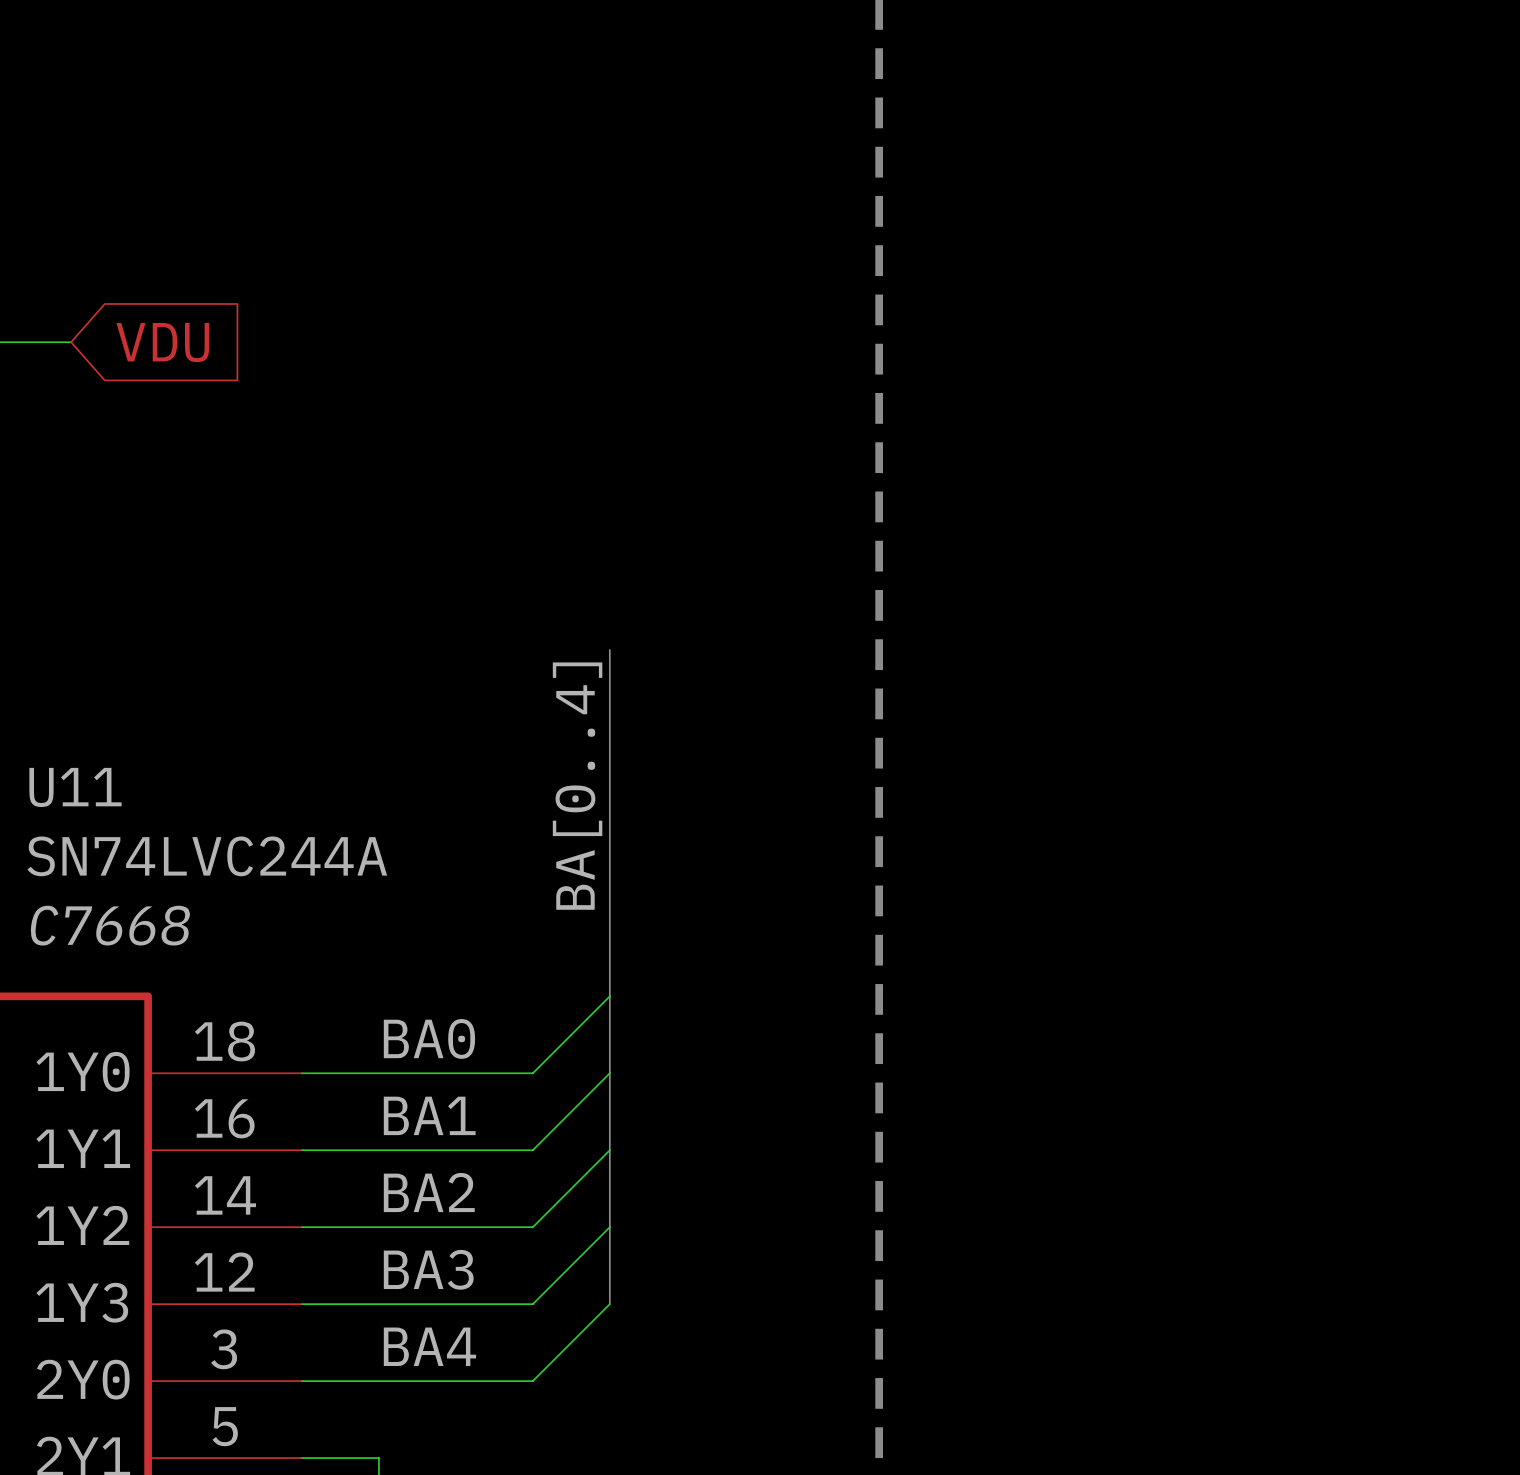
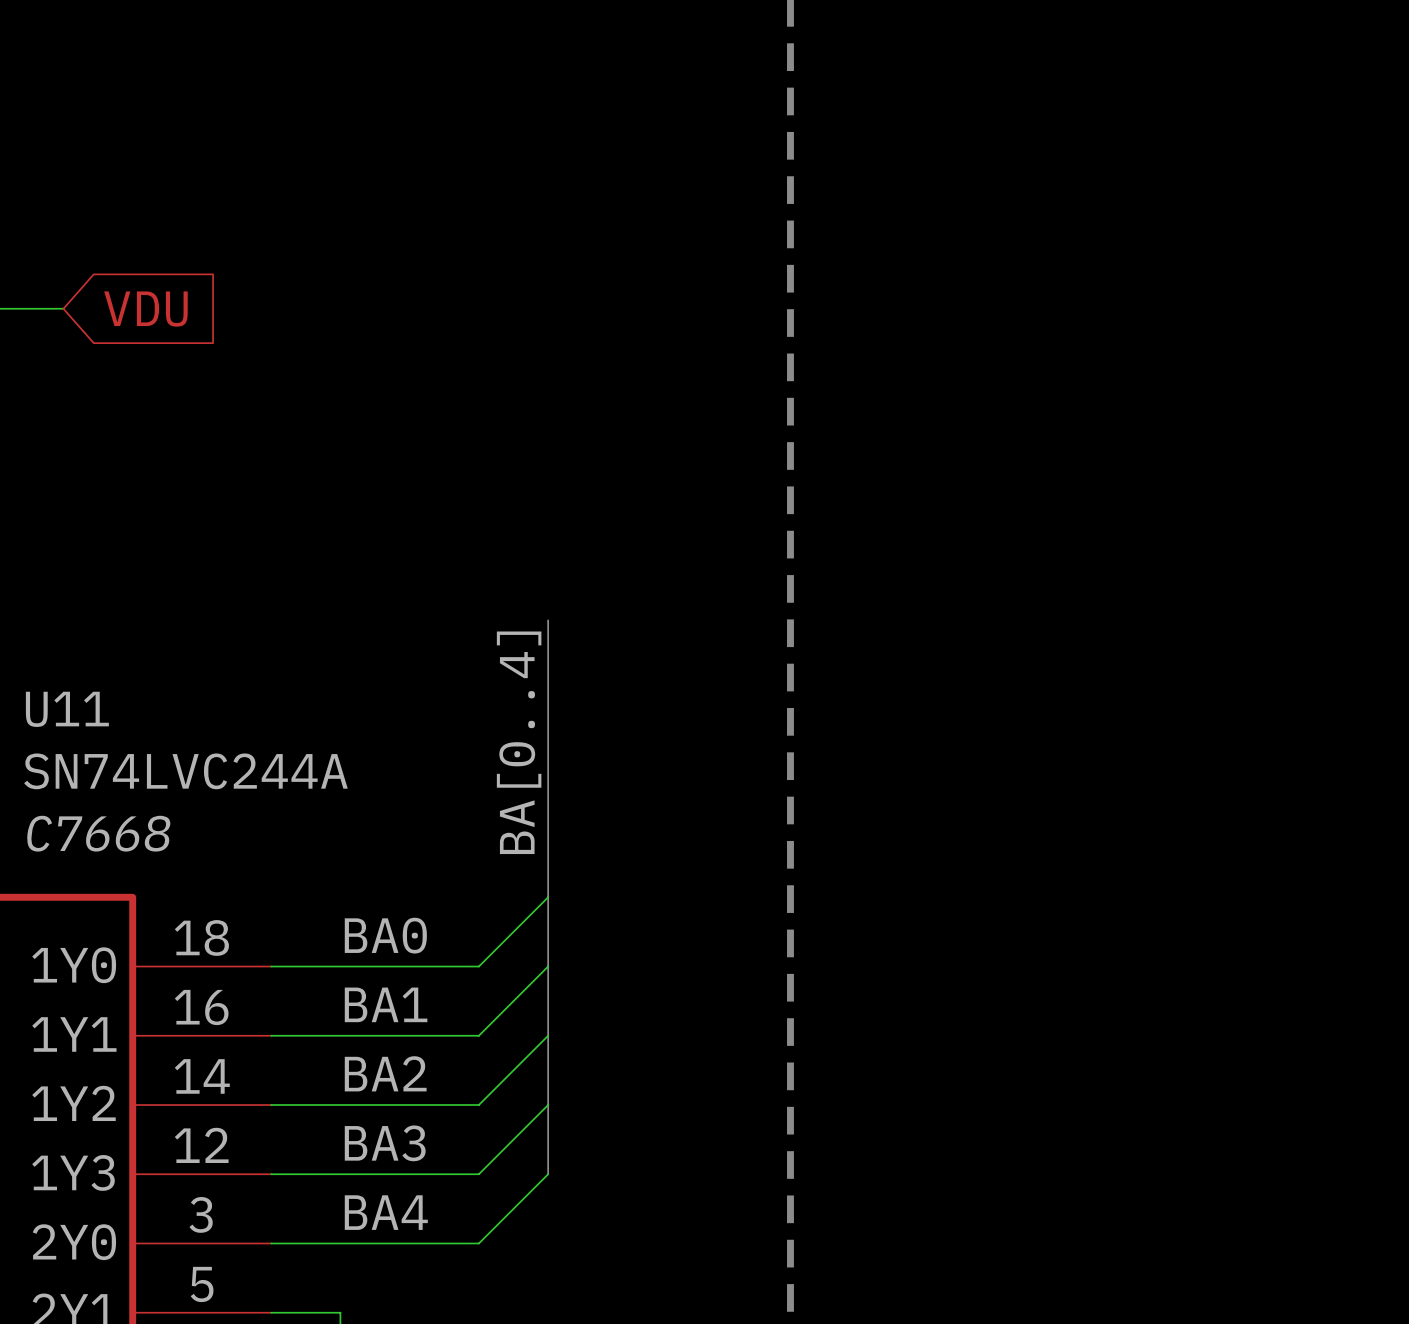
bus: (609, 650) (609, 688) -> none
label position: BA[0..4] (577, 786) -> BA[0..4] (519, 742)

